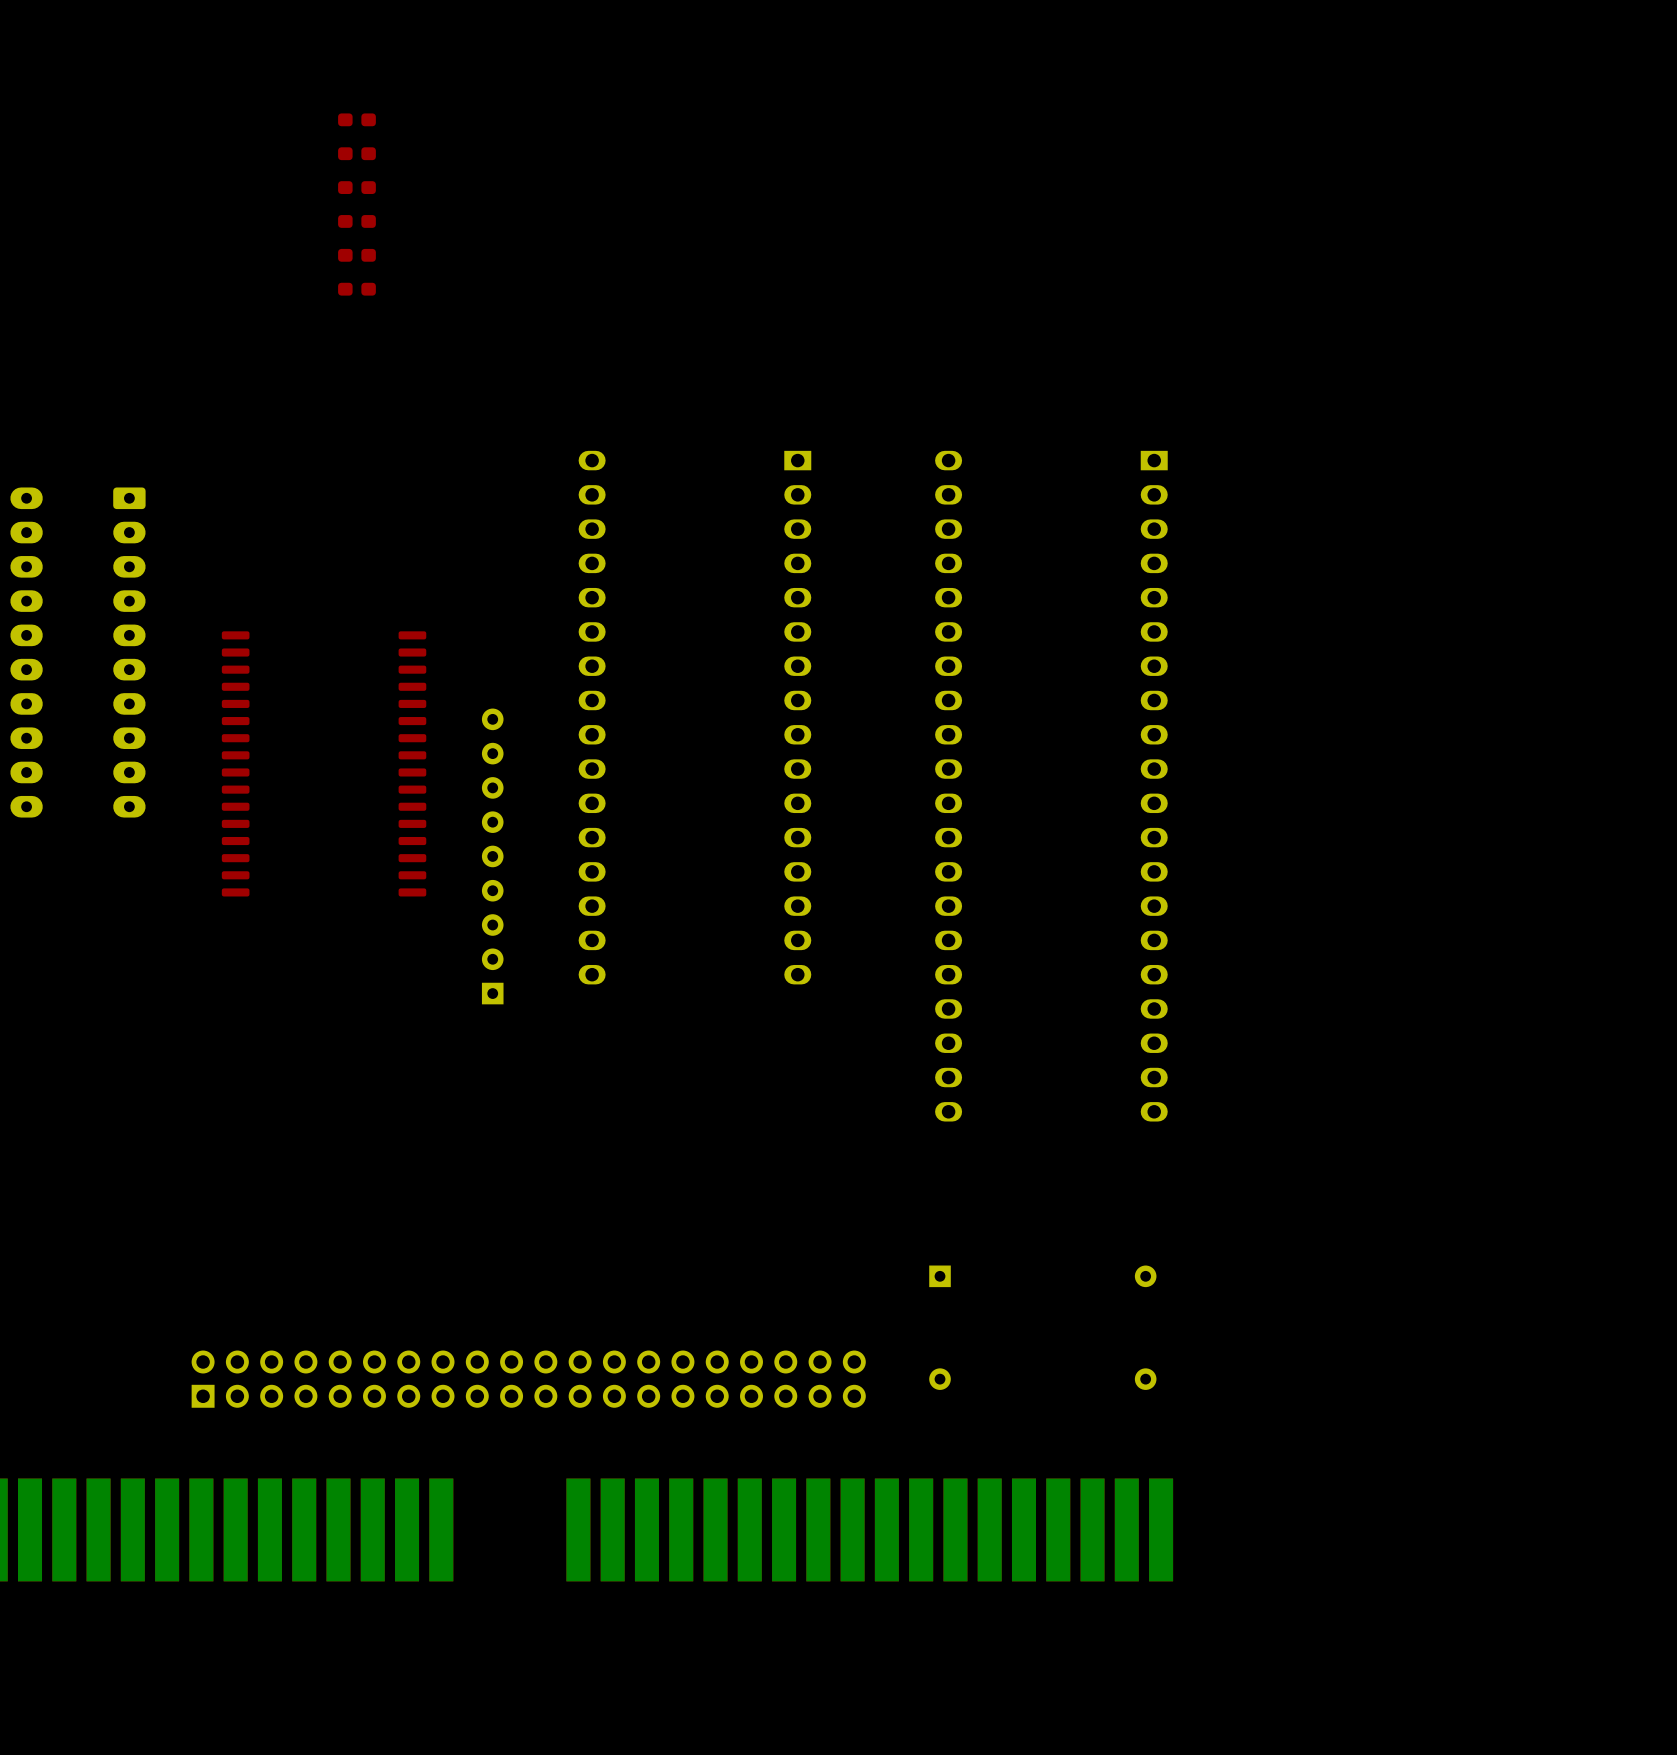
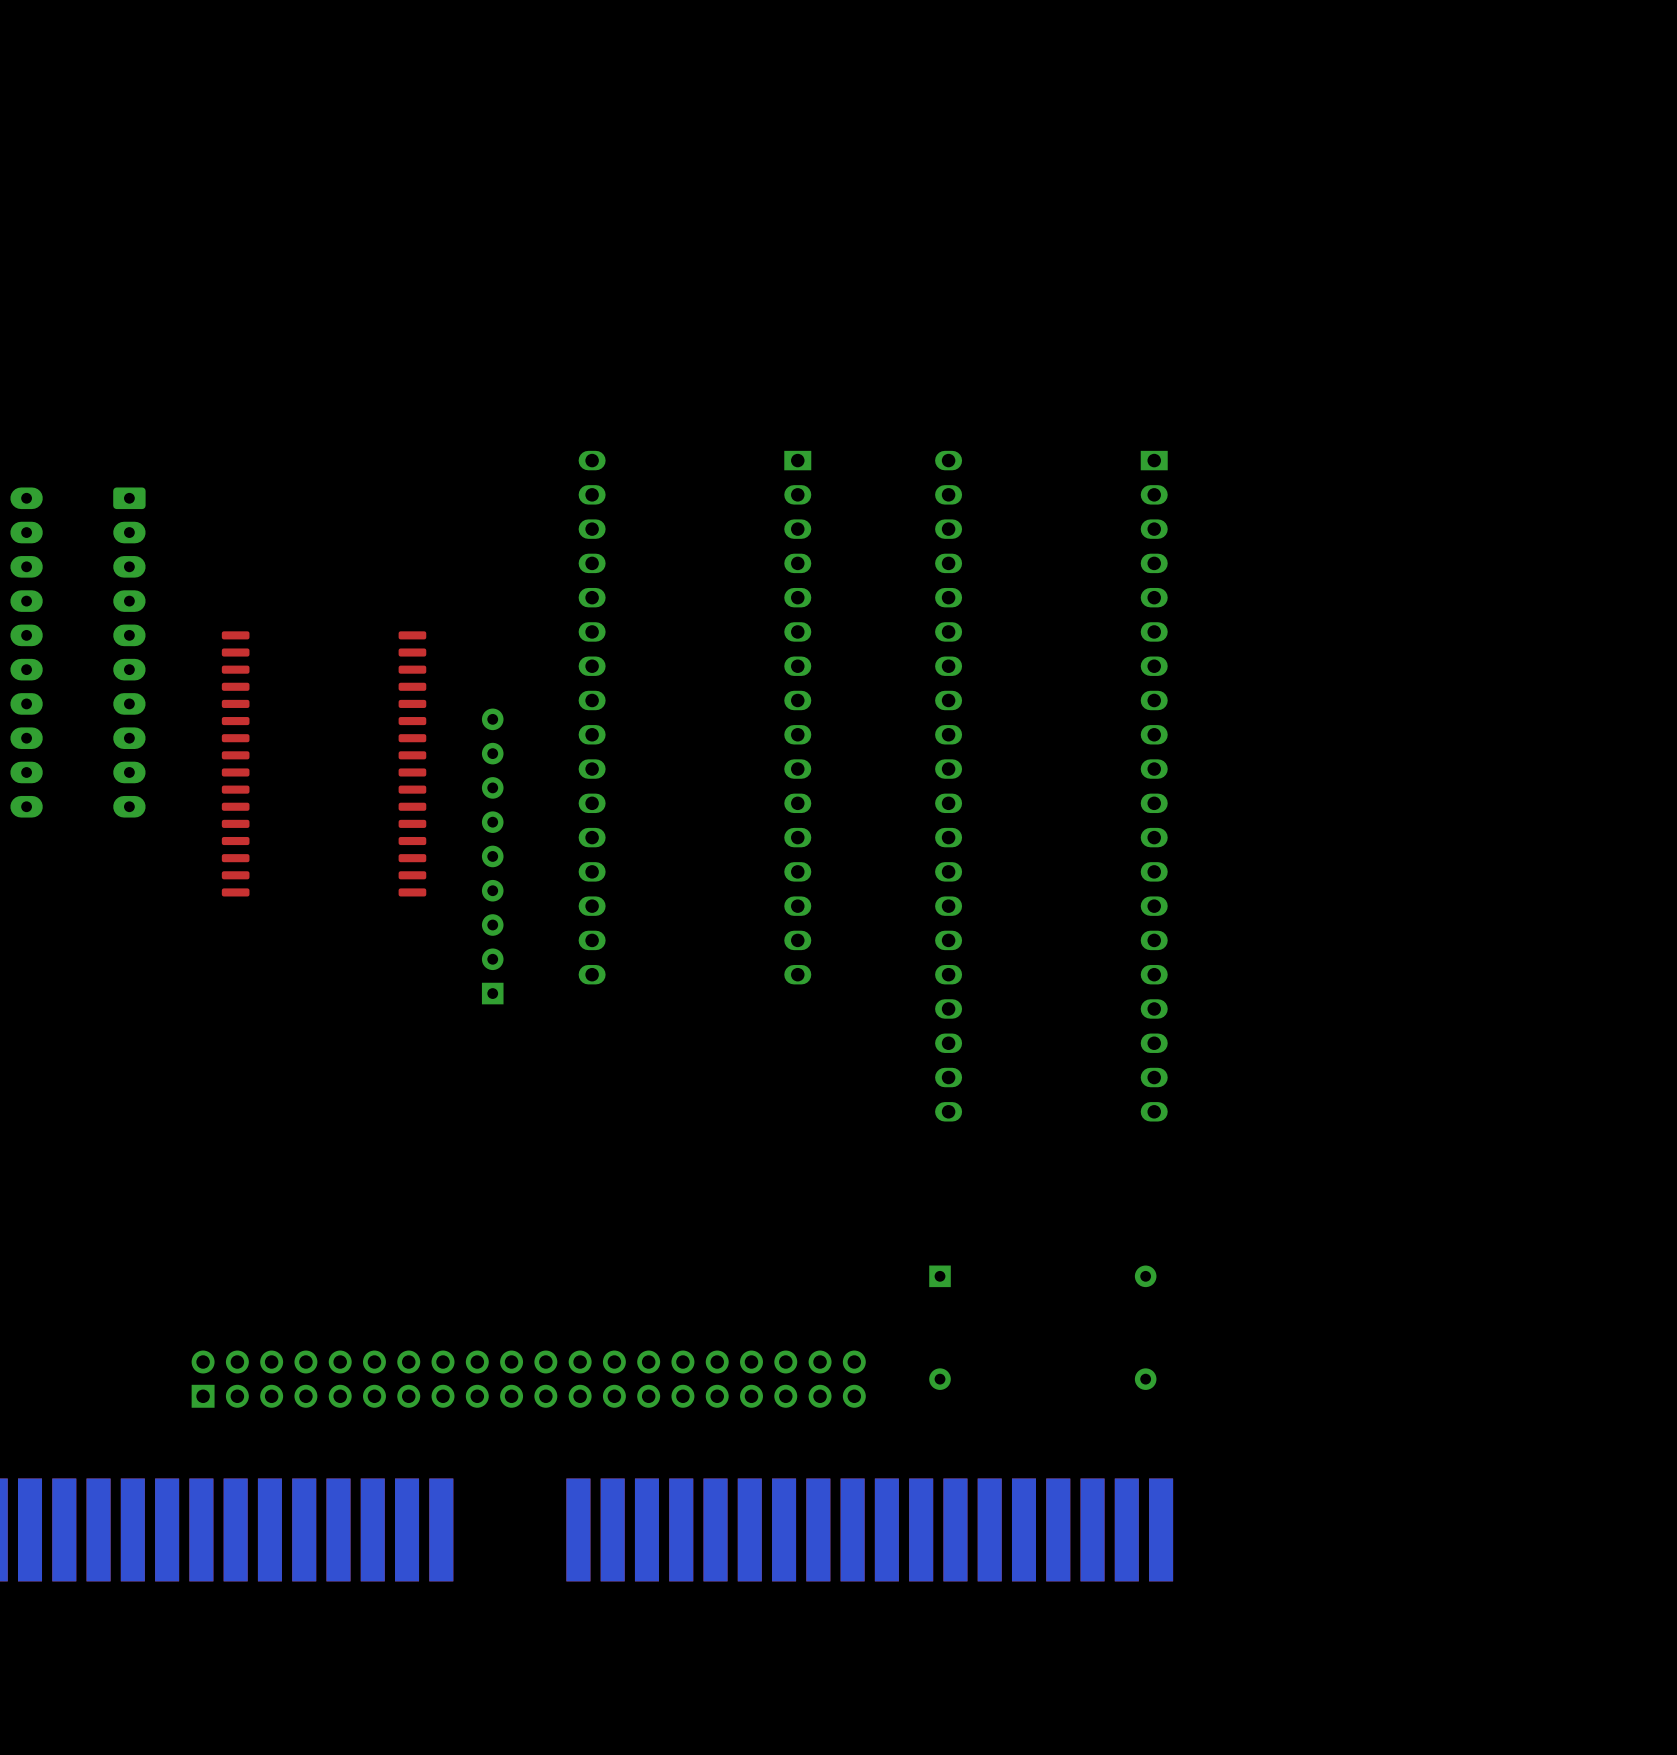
part: (356, 119) -> none
part: (356, 153) -> none
part: (356, 187) -> none
part: (356, 221) -> none
part: (356, 255) -> none
part: (356, 289) -> none

